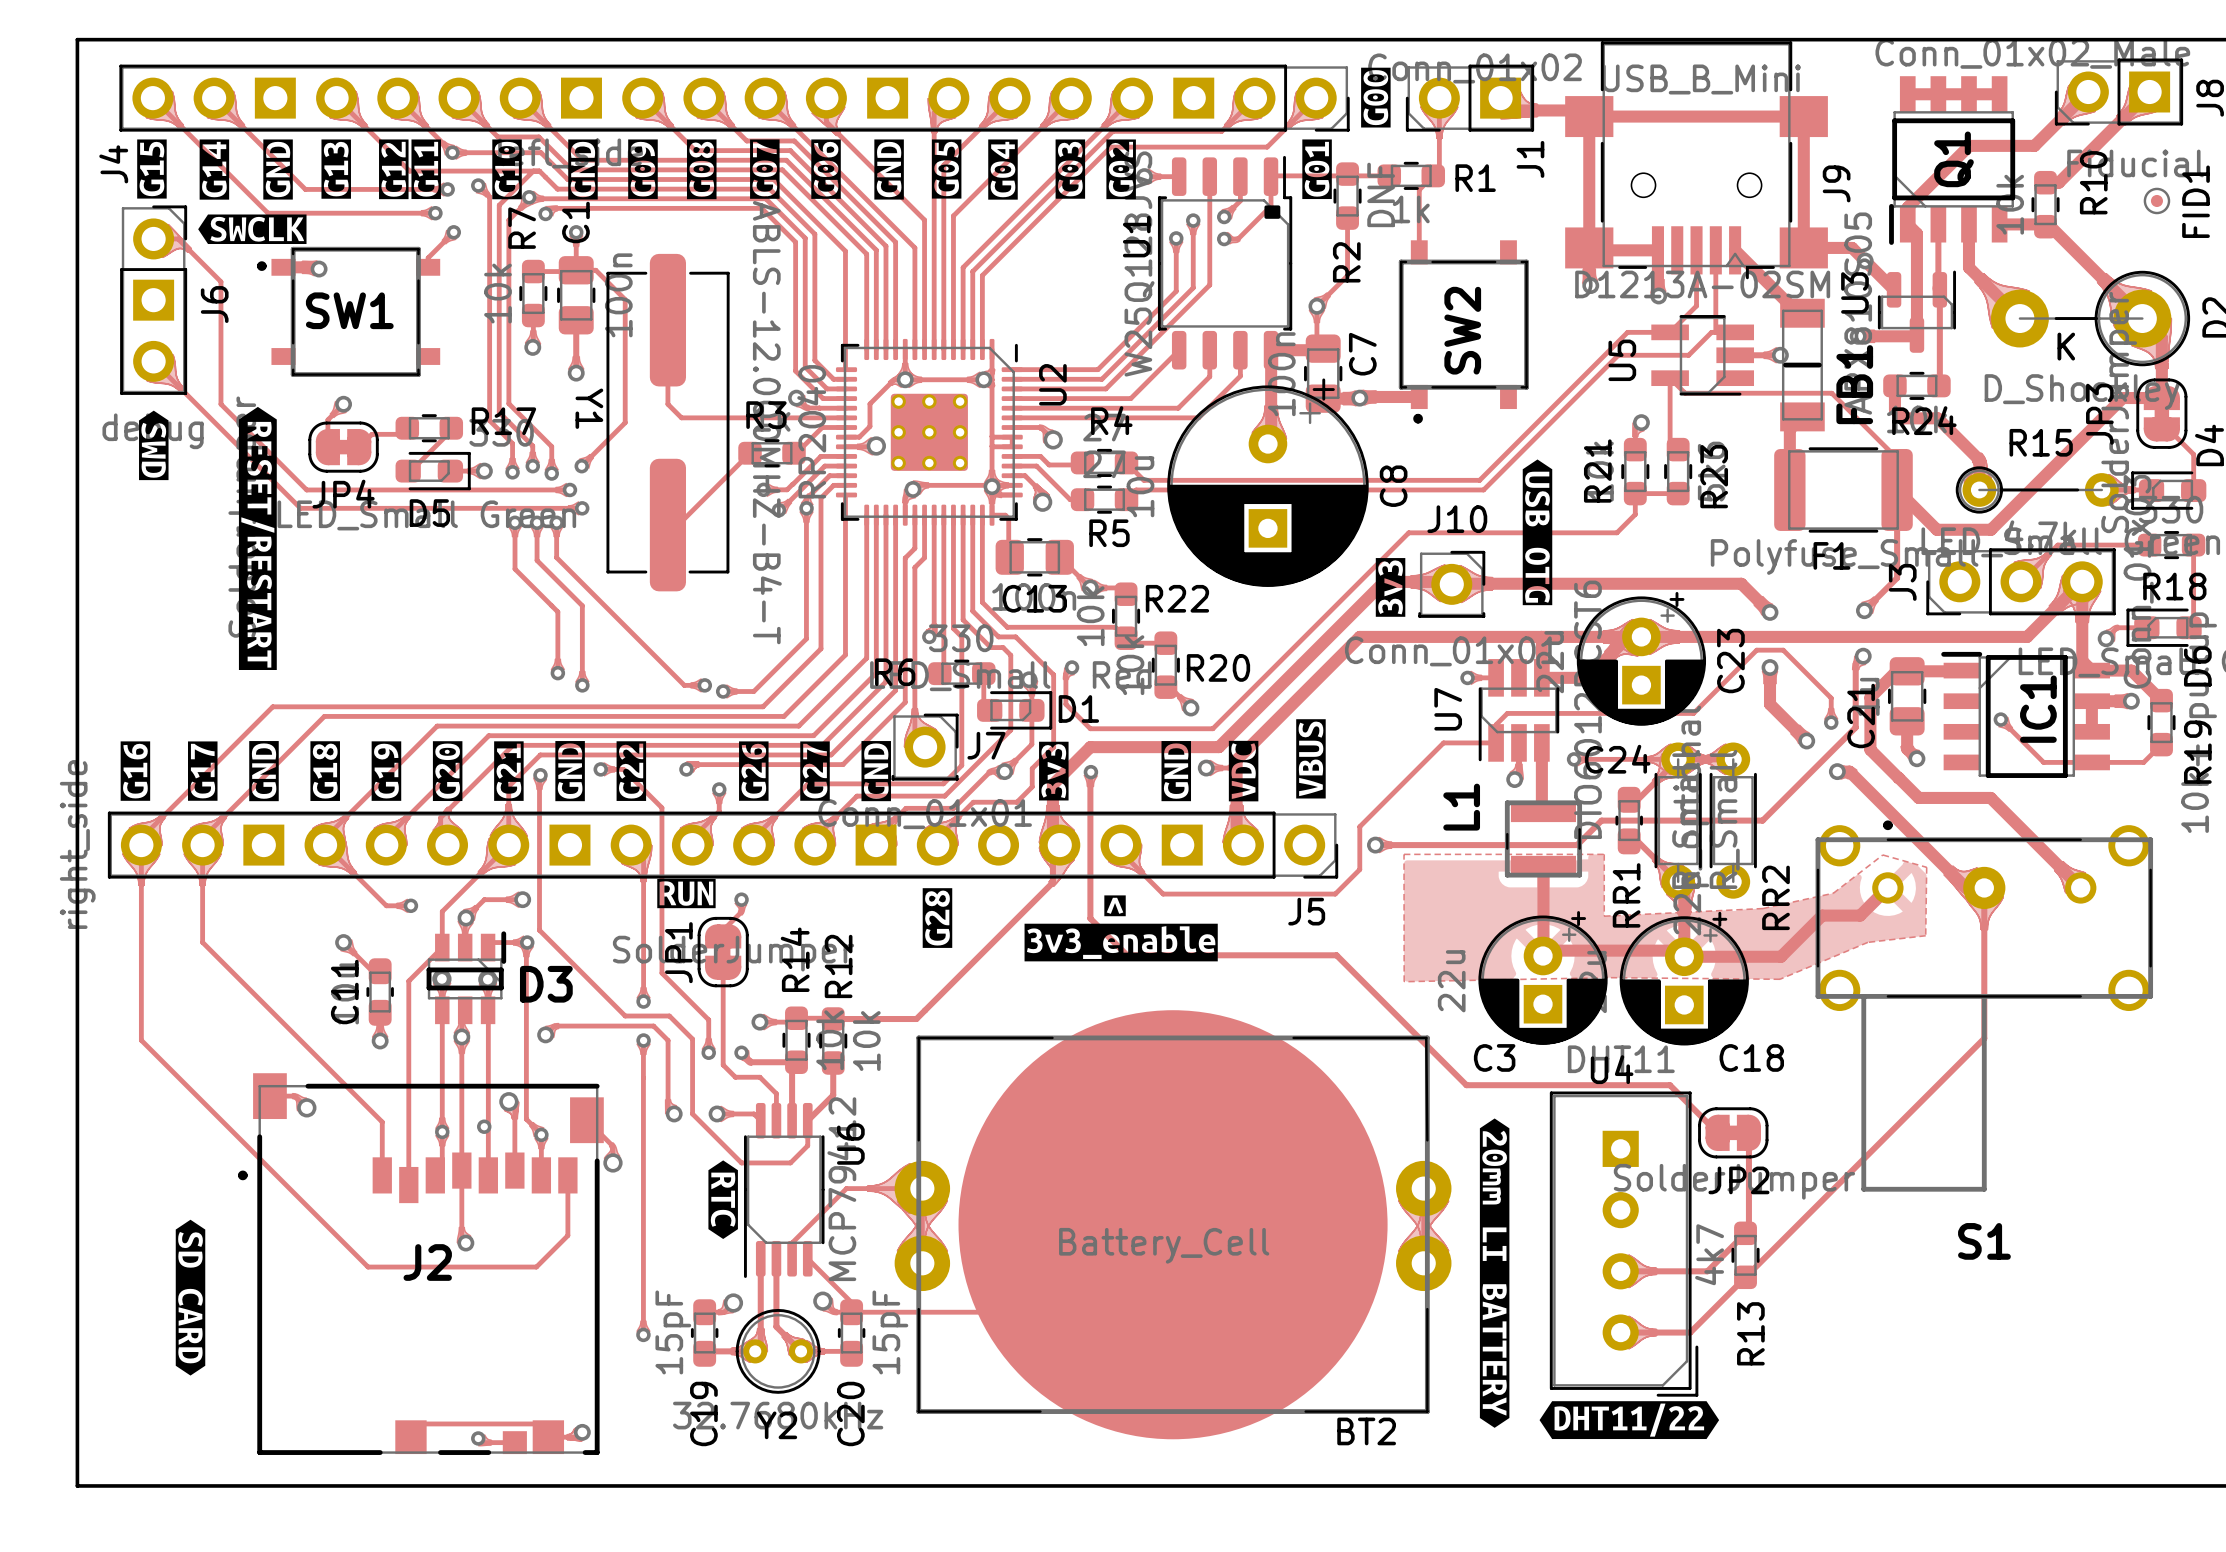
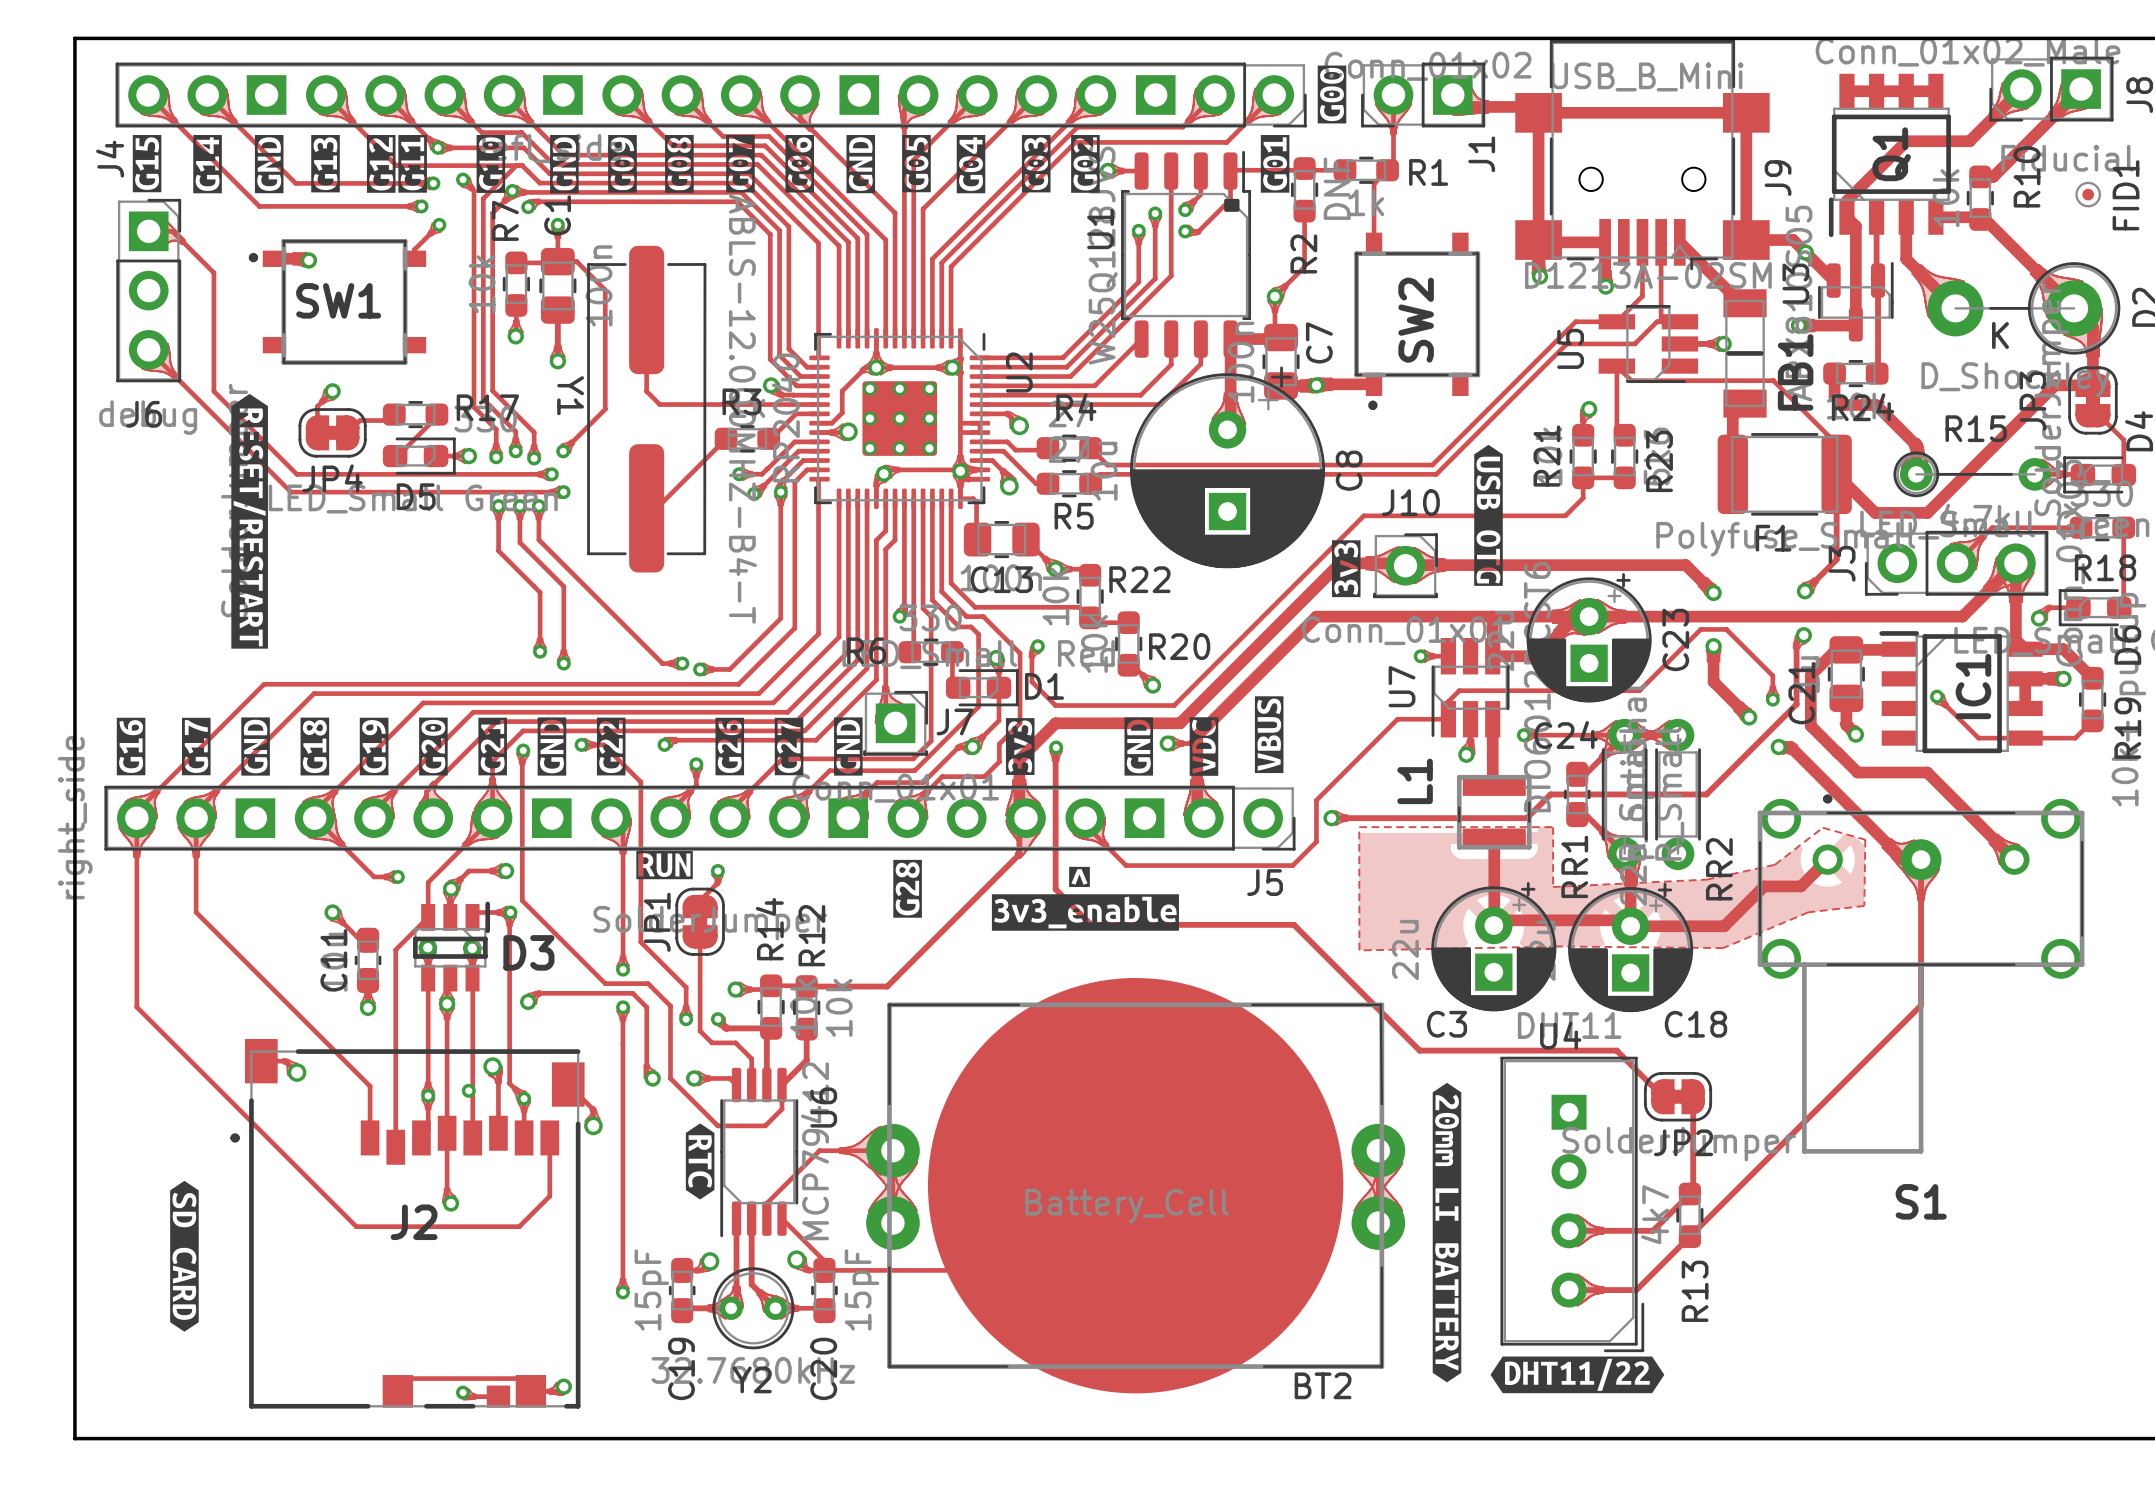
J6 footprint: [120, 205, 188, 395] -> [116, 198, 182, 383]
drawing: [198, 214, 307, 245] -> none
J6 name rotation: 0° (214, 304) -> 90° clockwise (144, 414)
J6 name position: J6 (214, 304) -> J6 (144, 414)
drawing: [139, 410, 169, 481] -> none
J7 footprint: [891, 713, 959, 781] -> [863, 690, 929, 756]

